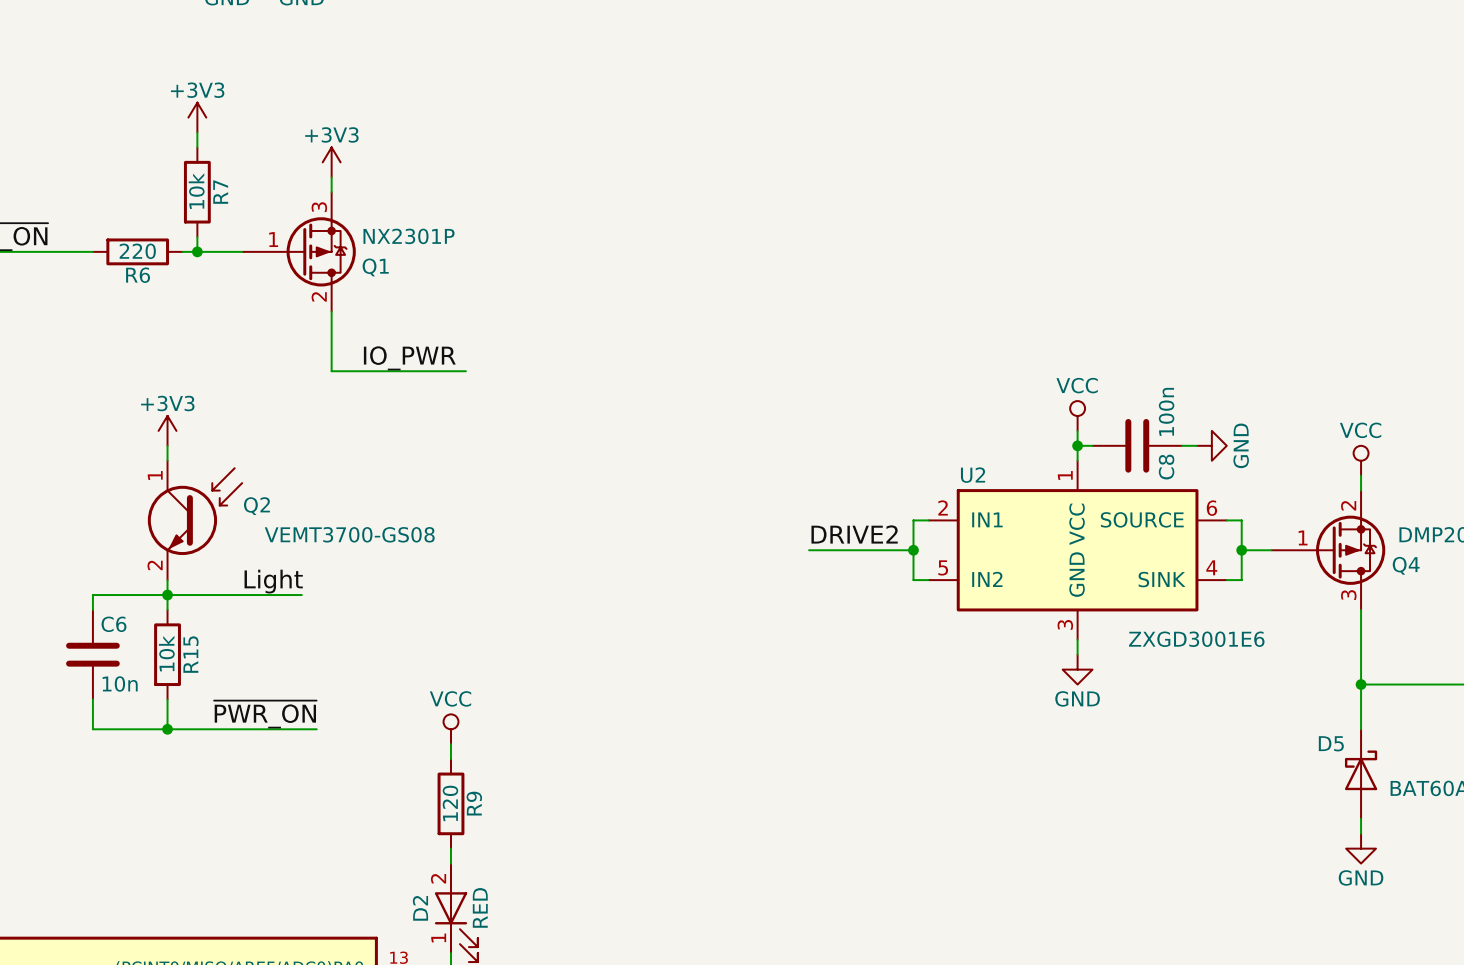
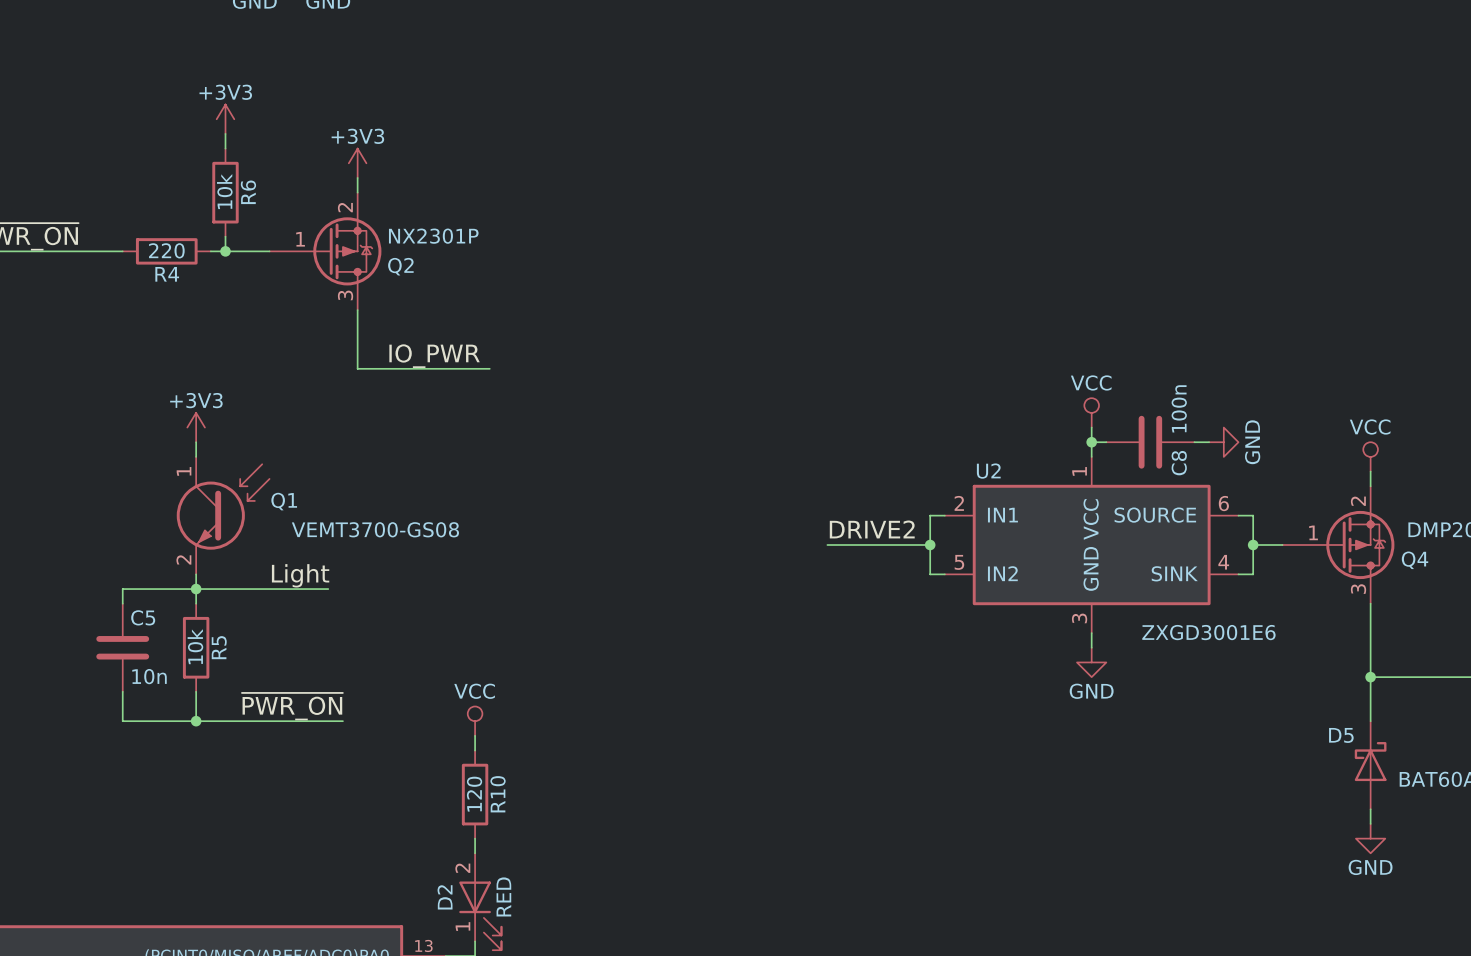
R7 name: R7 (220, 192) -> R6 (248, 192)
Q1 pin number: 3 (319, 207) -> 2 (345, 207)
Q1 name: Q1 (375, 267) -> Q2 (400, 266)
R6 name: R6 (138, 275) -> R4 (167, 274)
Q1 pin number: 2 (319, 296) -> 3 (345, 295)
Q2 name: Q2 (256, 506) -> Q1 (284, 501)
C6 name: C6 (113, 624) -> C5 (143, 617)
R15 name: R15 (190, 654) -> R5 (219, 647)
R9 name: R9 (474, 803) -> R10 (498, 794)

